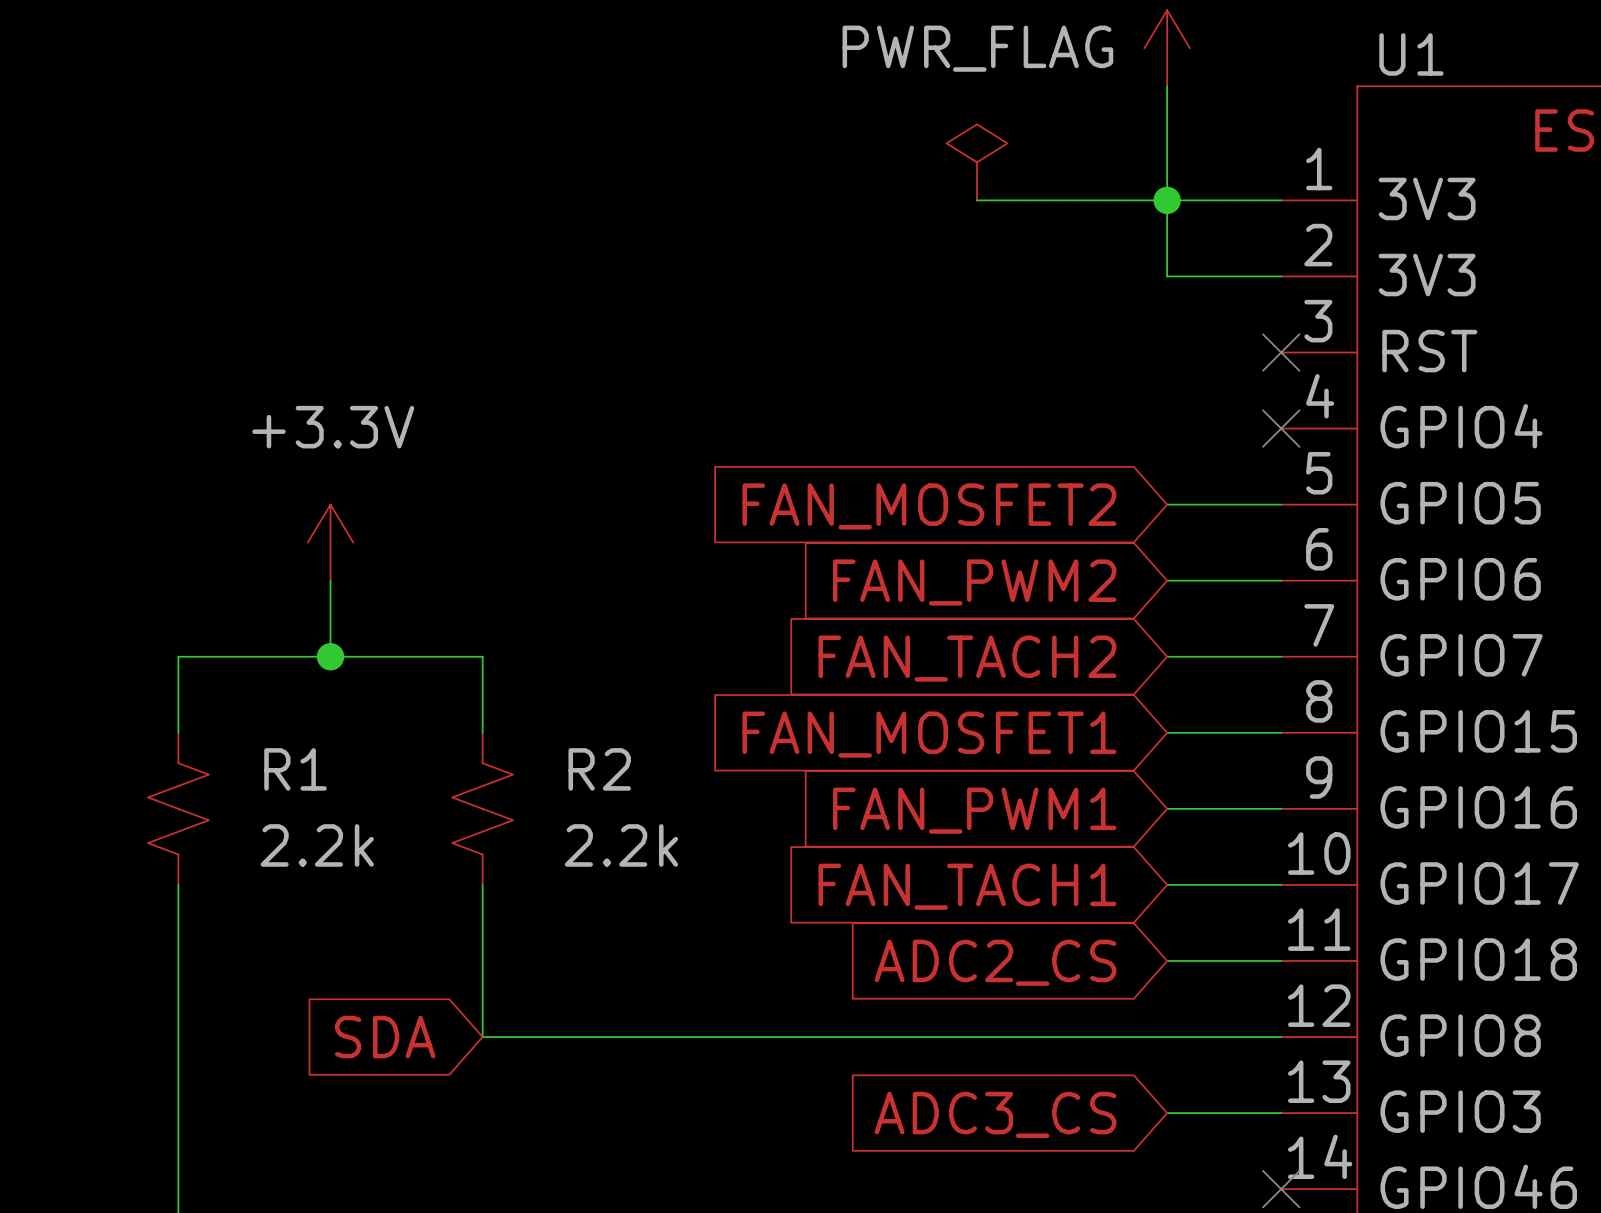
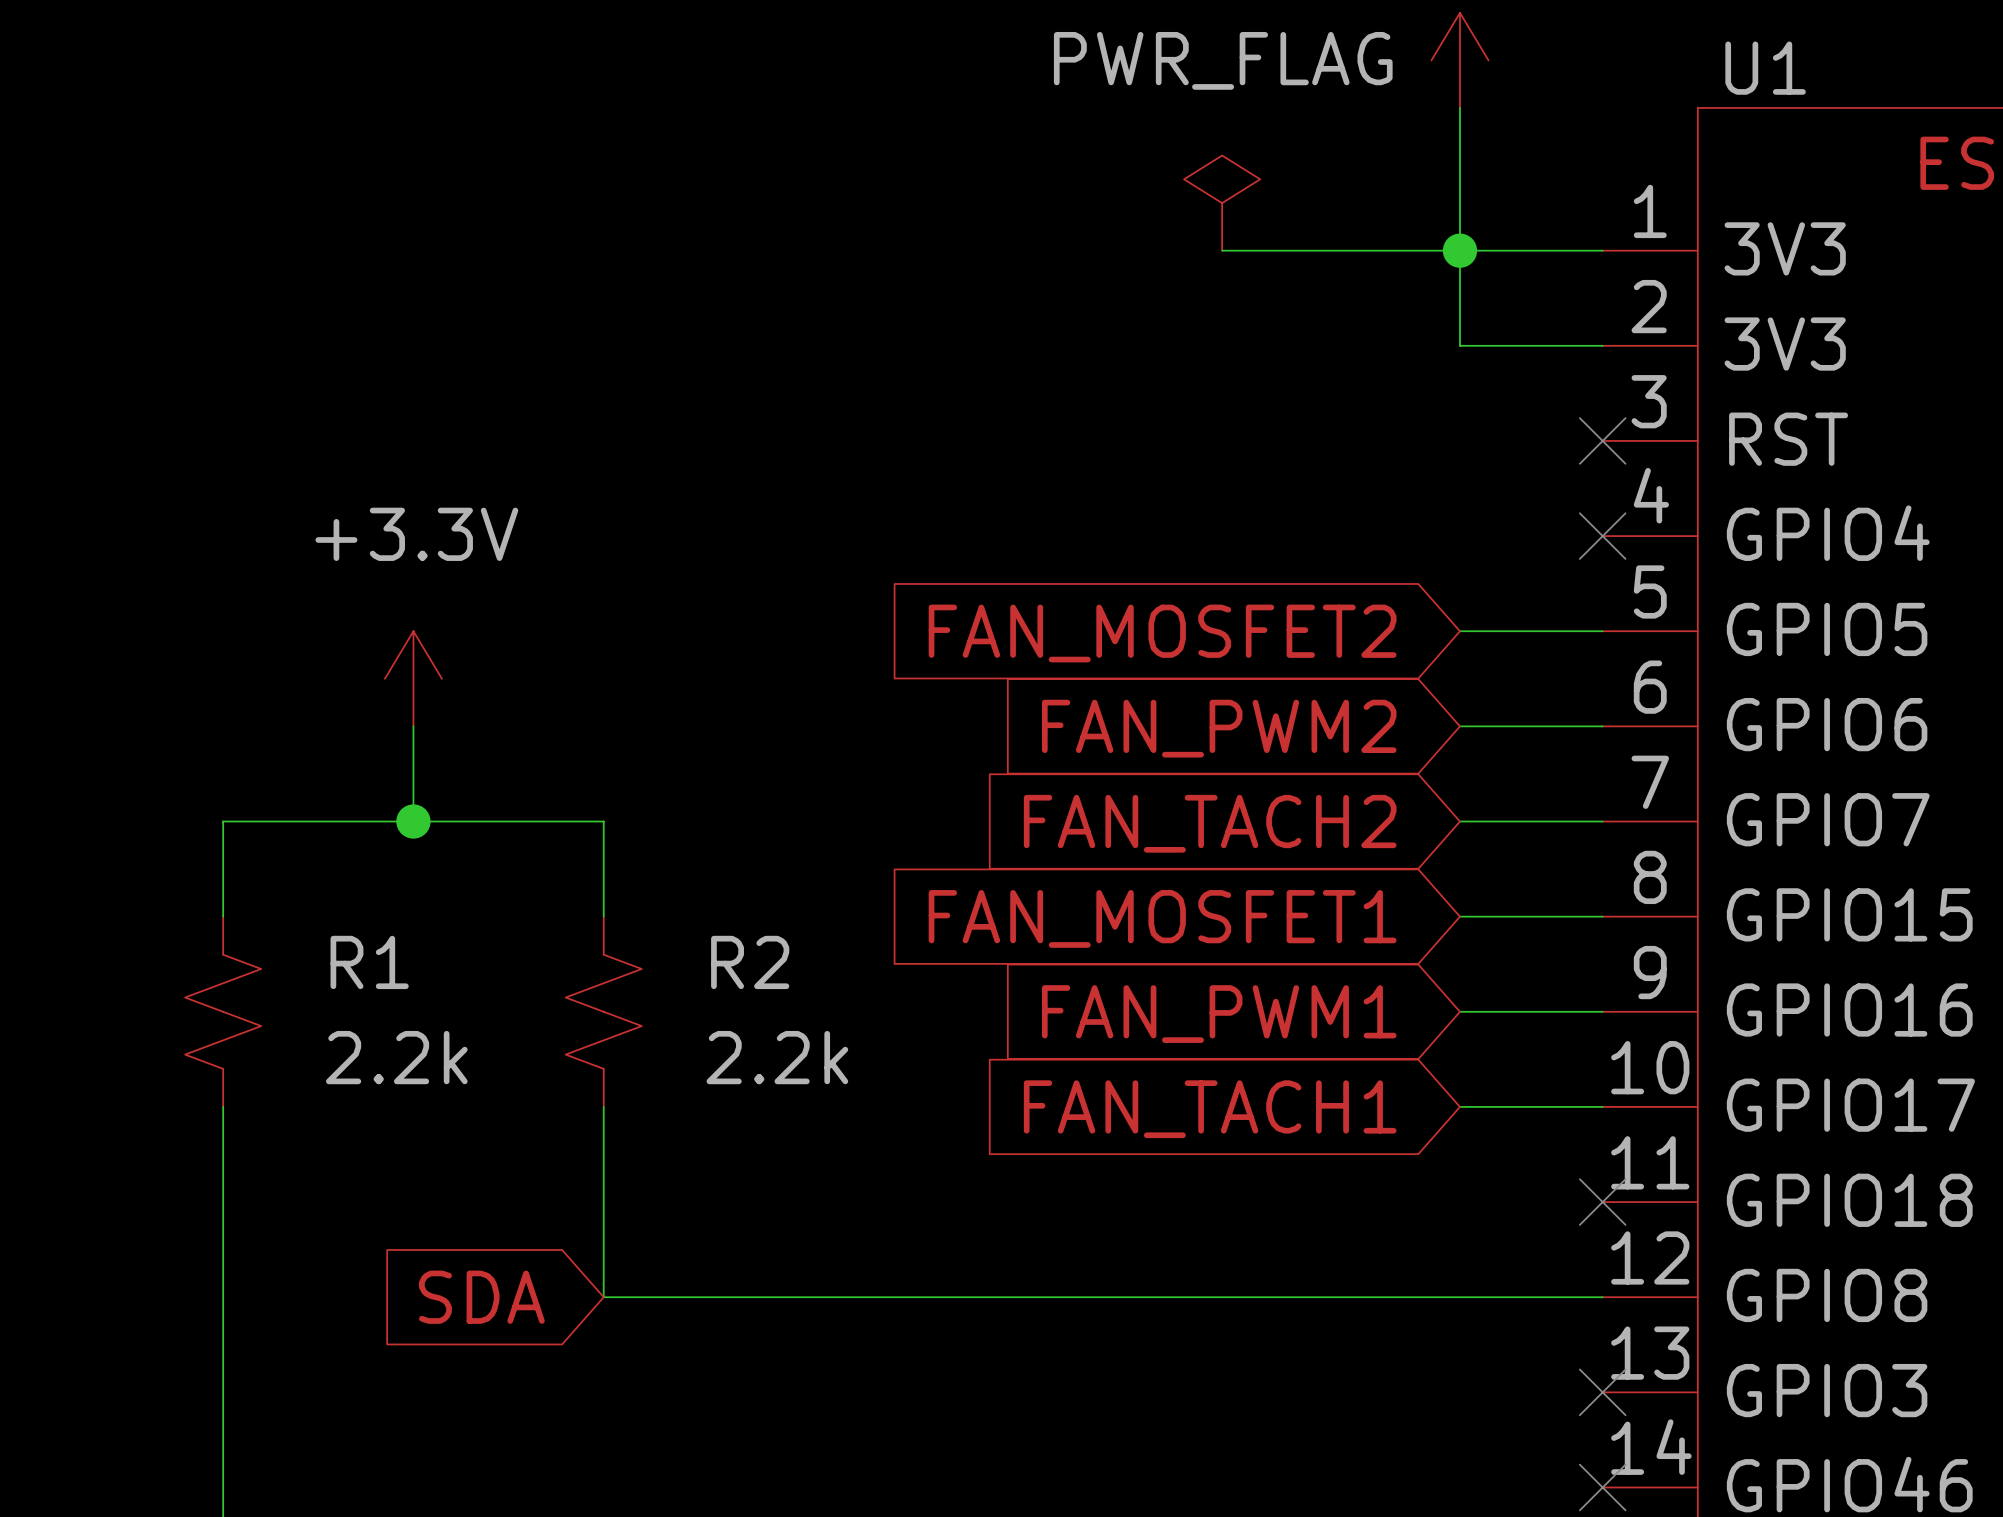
wire: (1167, 960) (1281, 960) -> none
no-connect mark: none -> (1602, 1202)
global label: ADC2_CS (995, 962) -> none
wire: (1167, 1113) (1281, 1113) -> none
no-connect mark: none -> (1602, 1392)
global label: ADC3_CS (995, 1114) -> none

